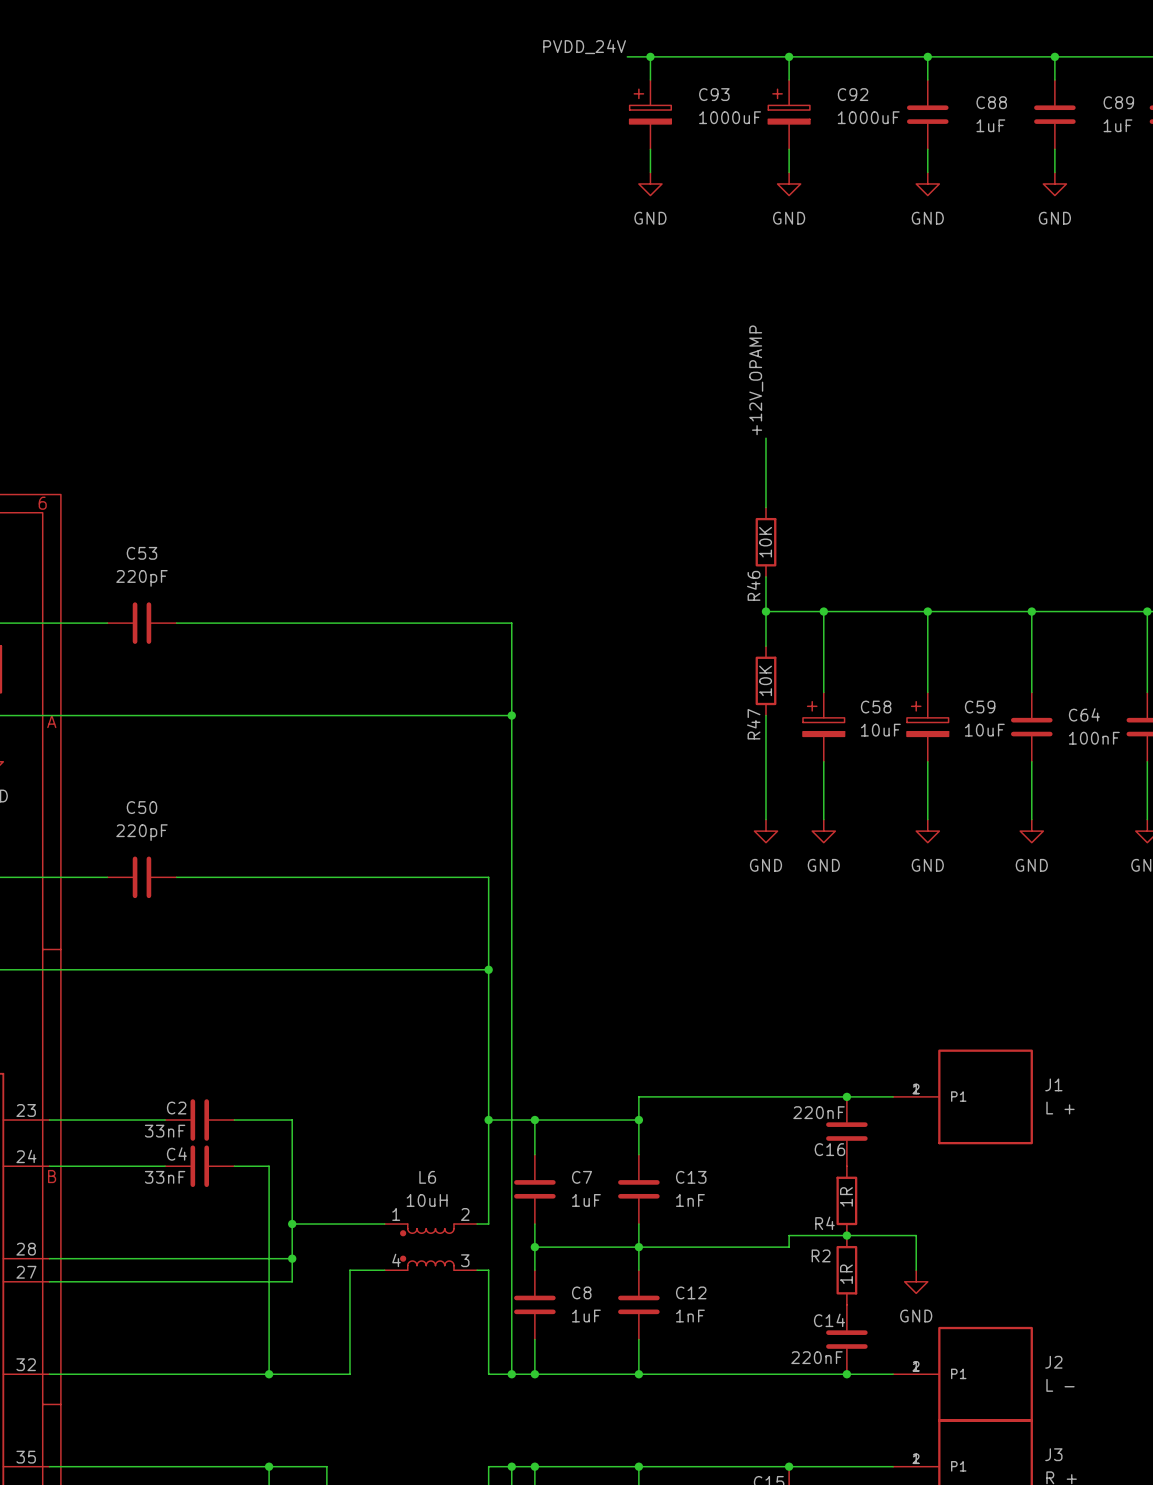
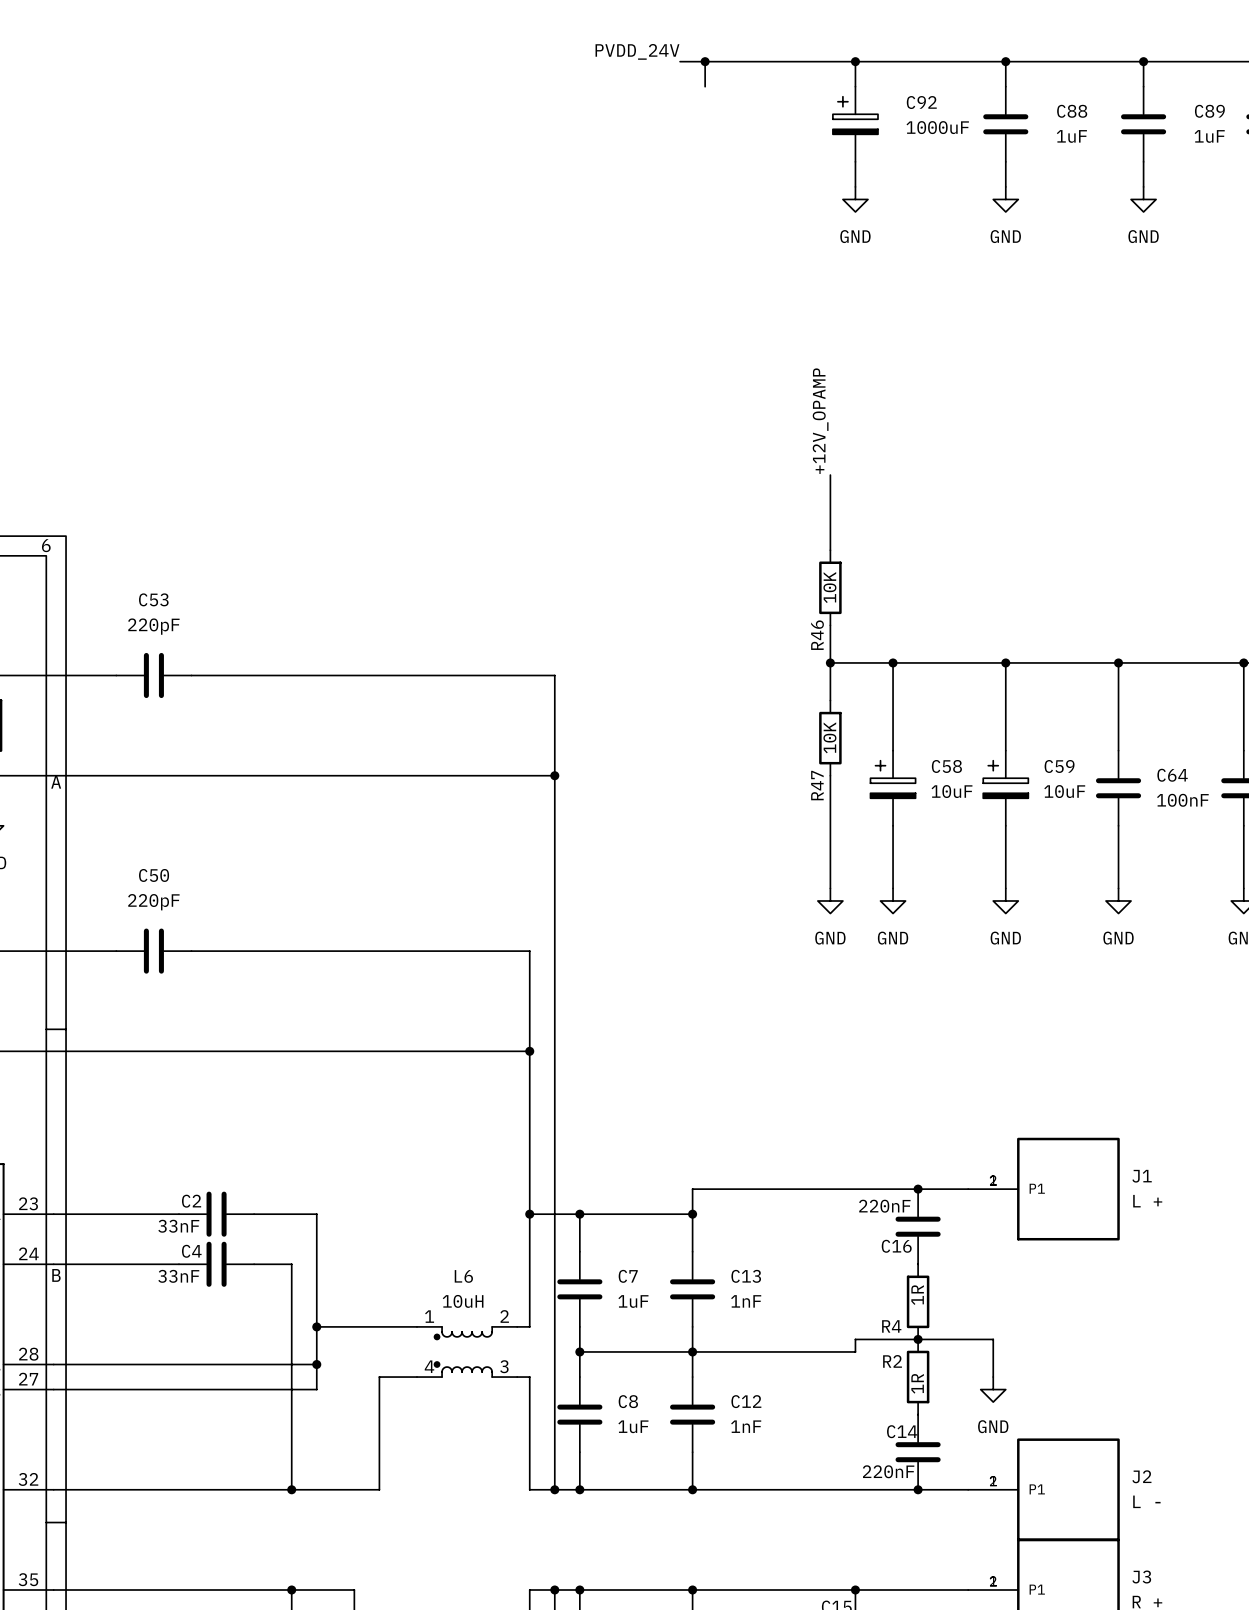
C93: 1000uF (650, 114) -> none
wire: (650, 149) (650, 172) -> none
power symbol: GND (650, 183) -> none

